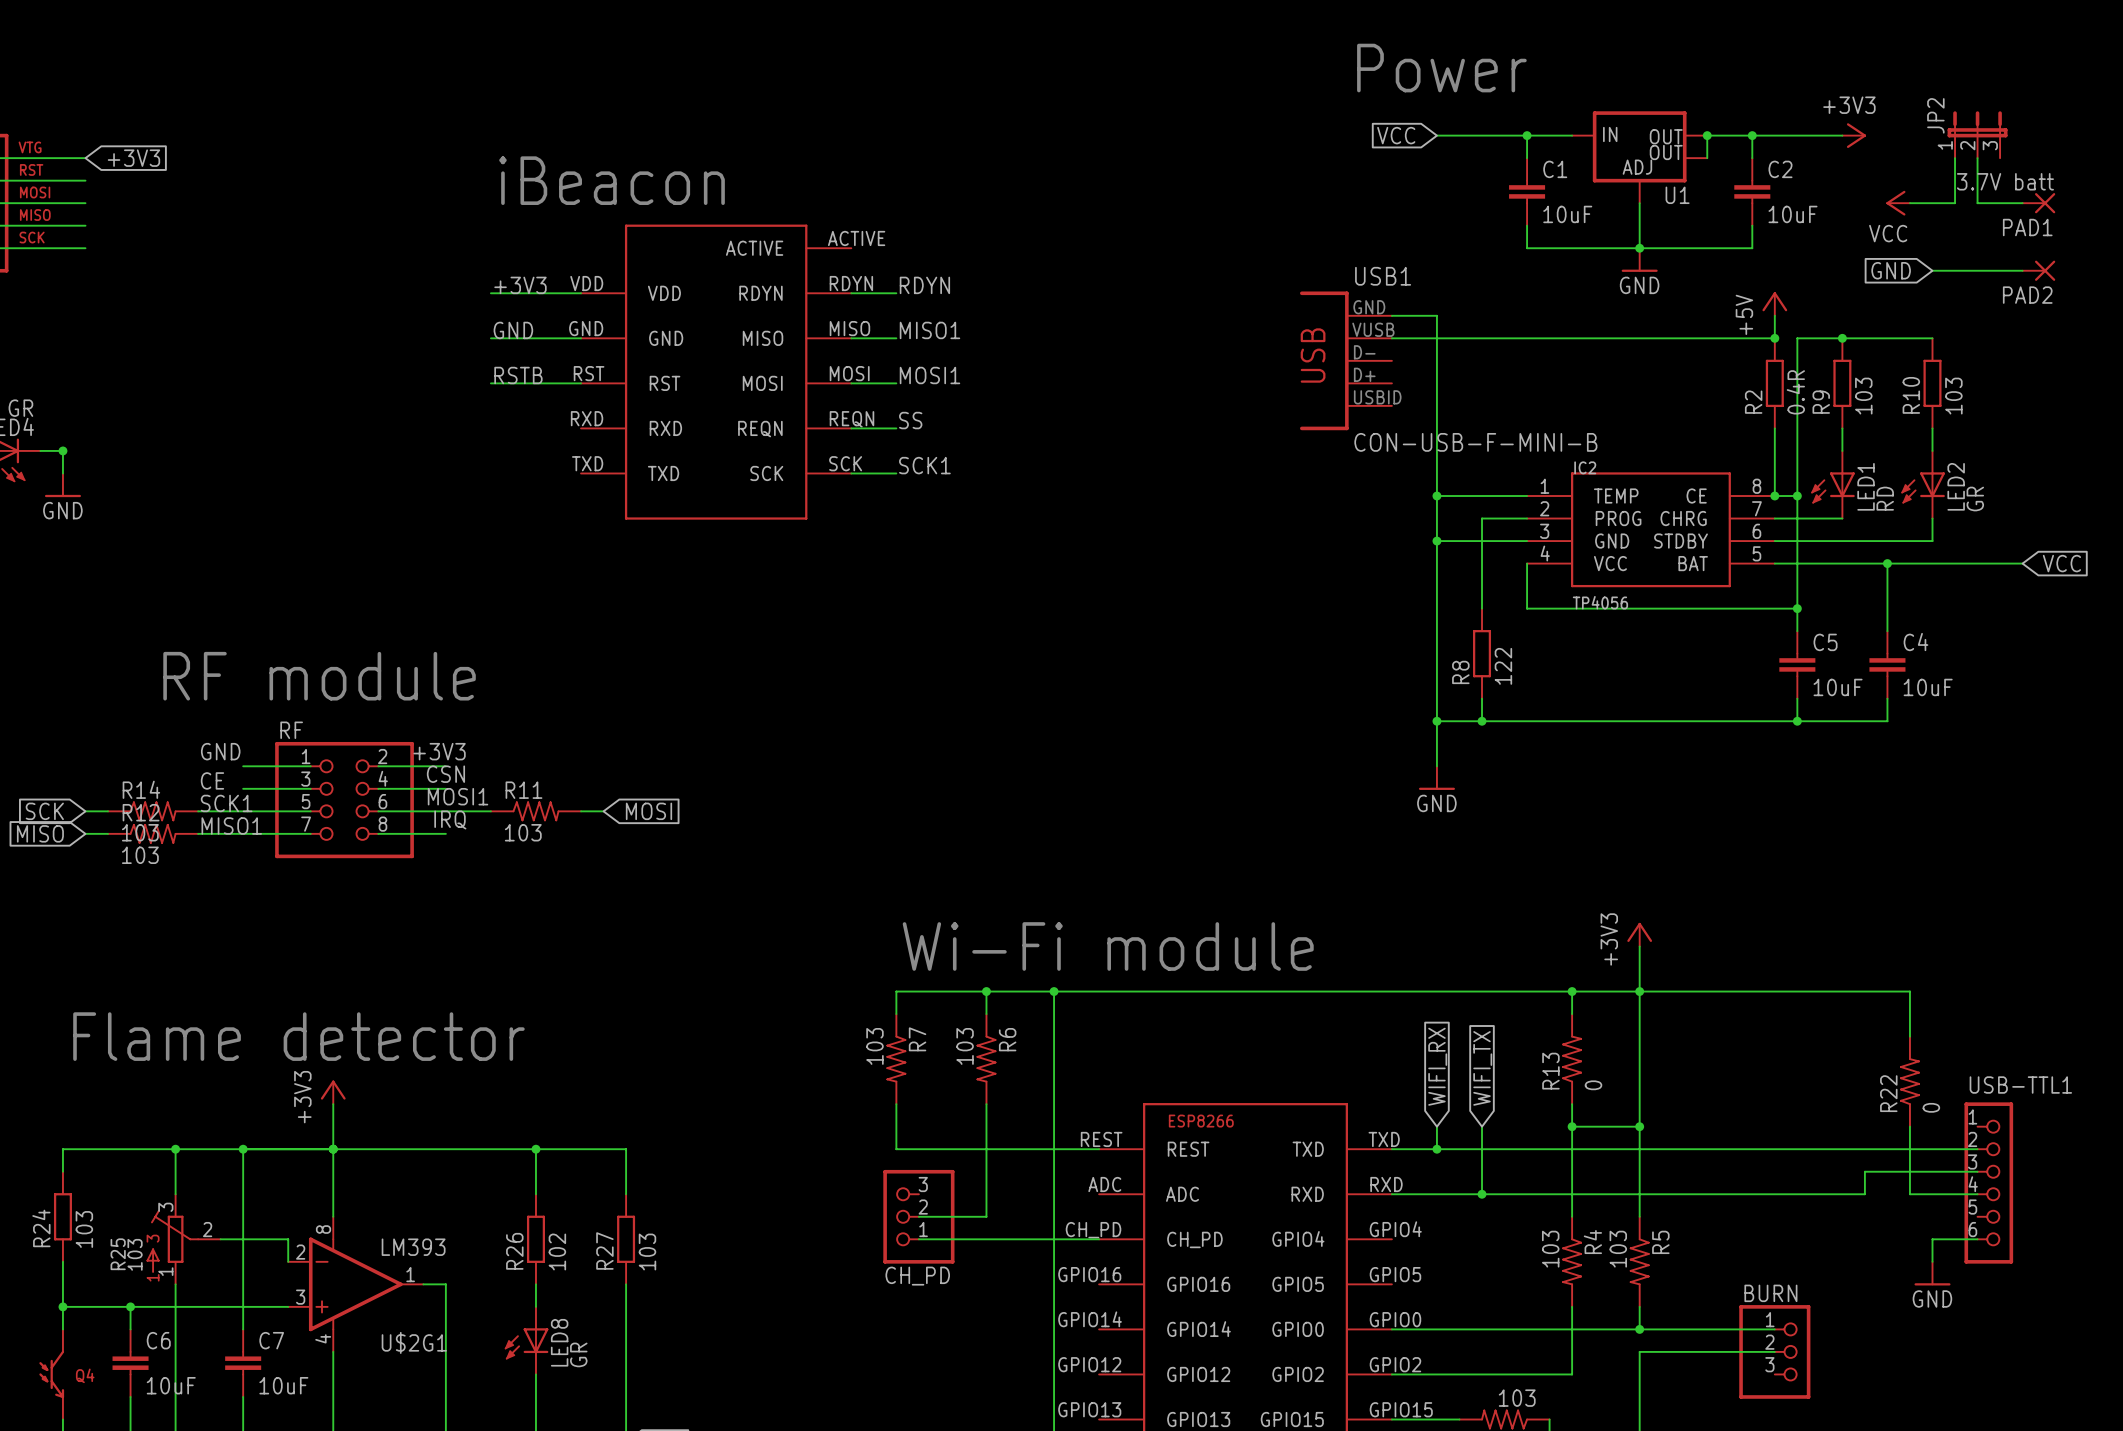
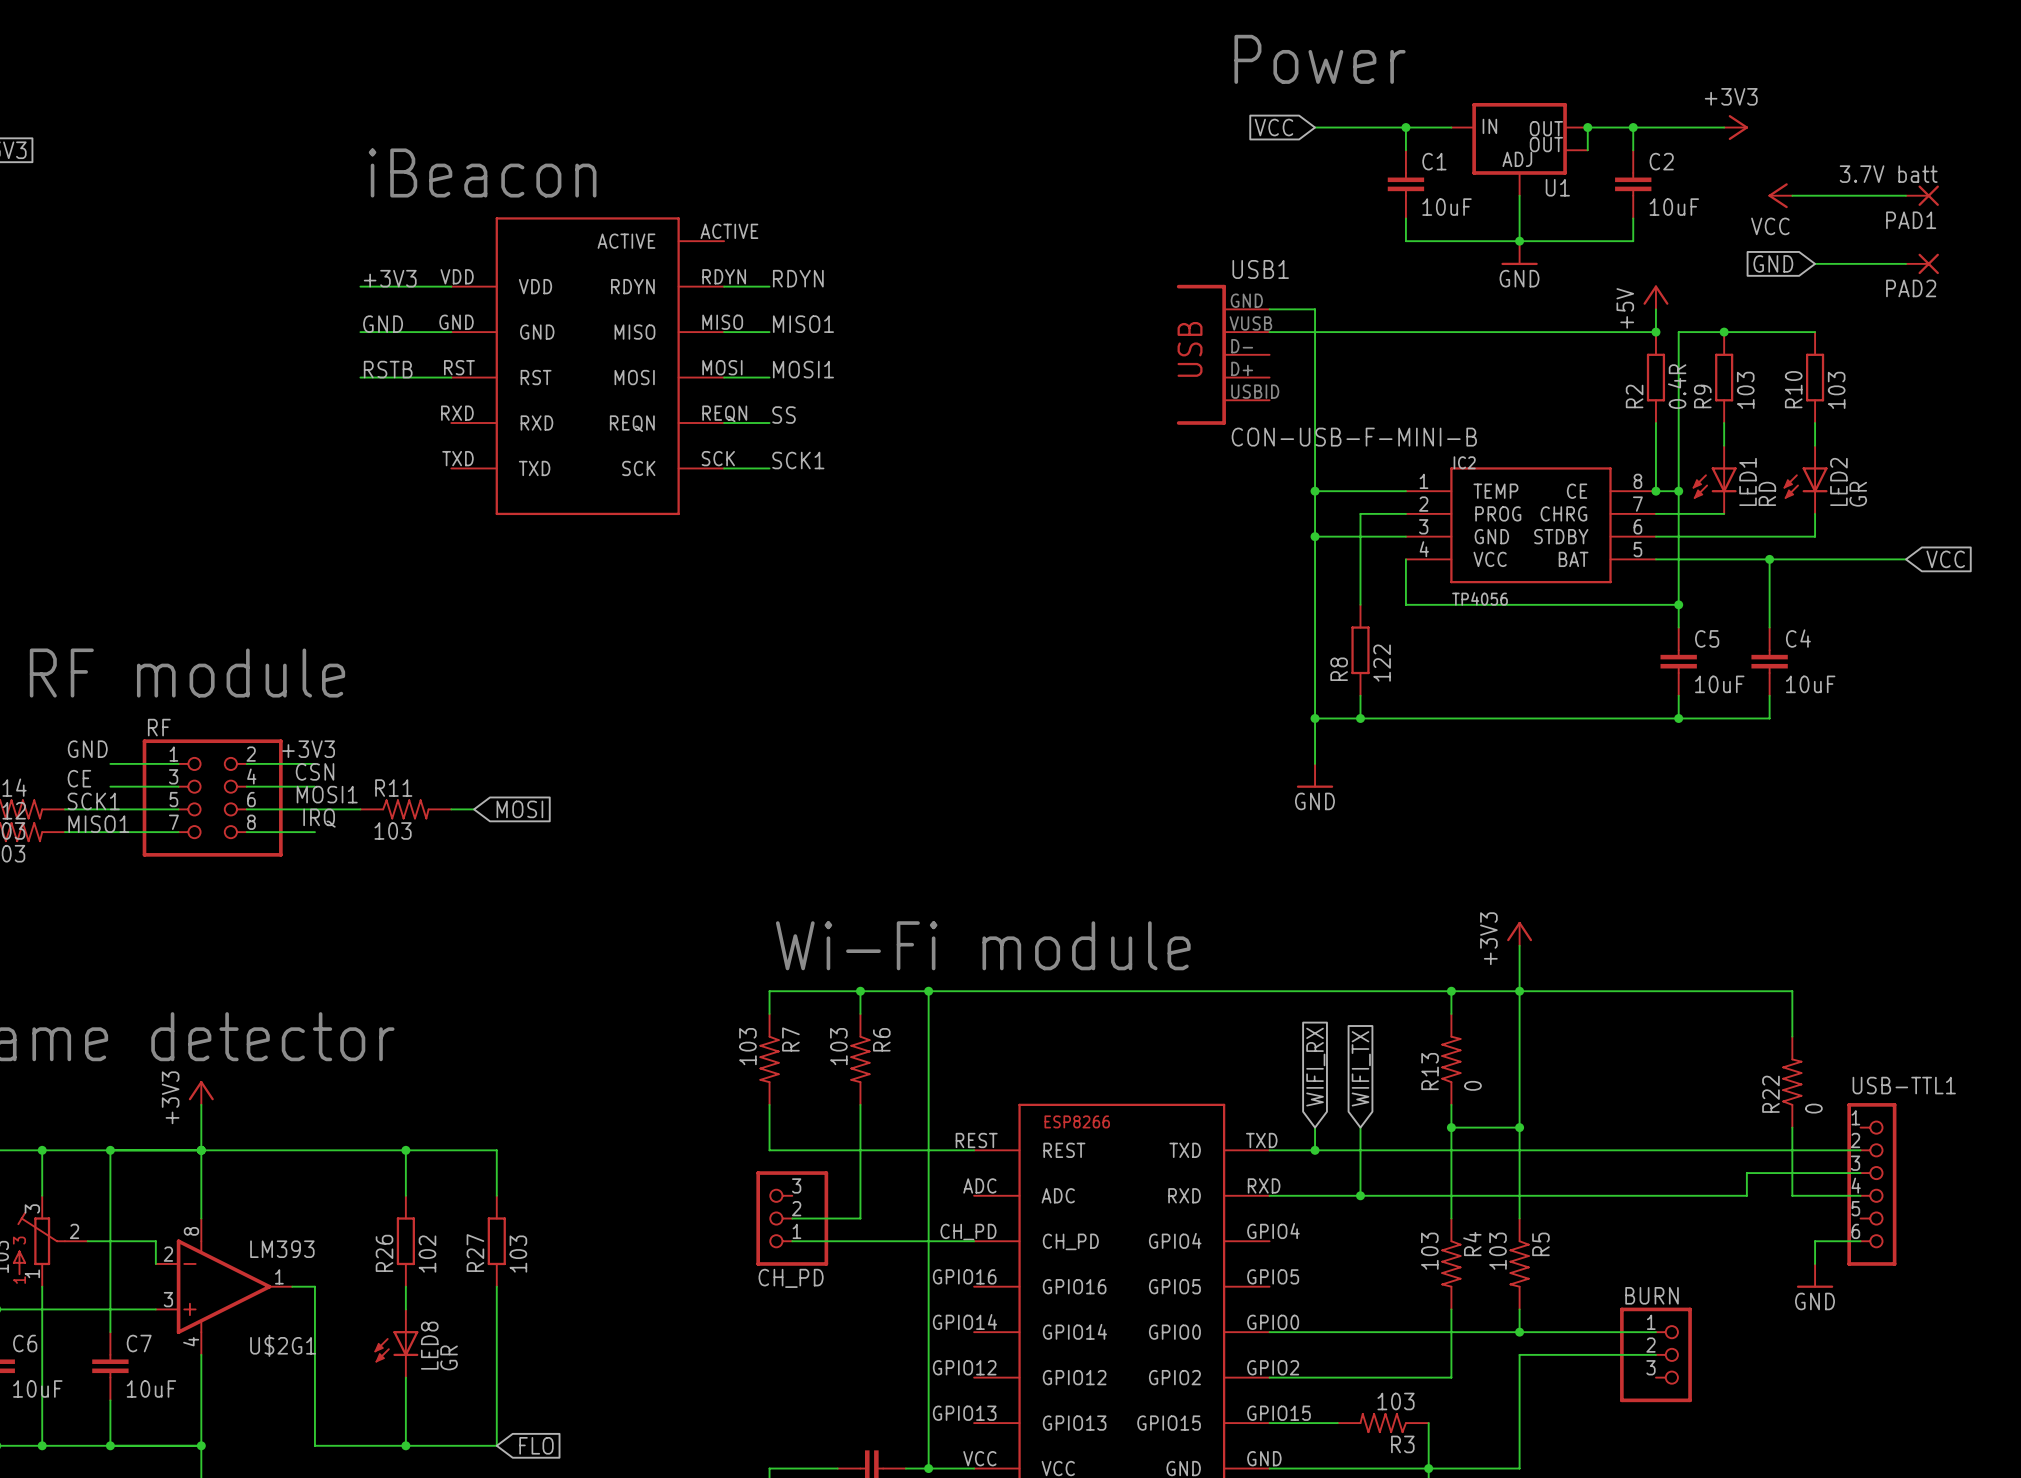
JP2: (1977, 134) -> none
wire: (1955, 158) (1955, 203) -> (1860, 195) (1837, 195)
wire: (1977, 158) (1977, 203) -> none

